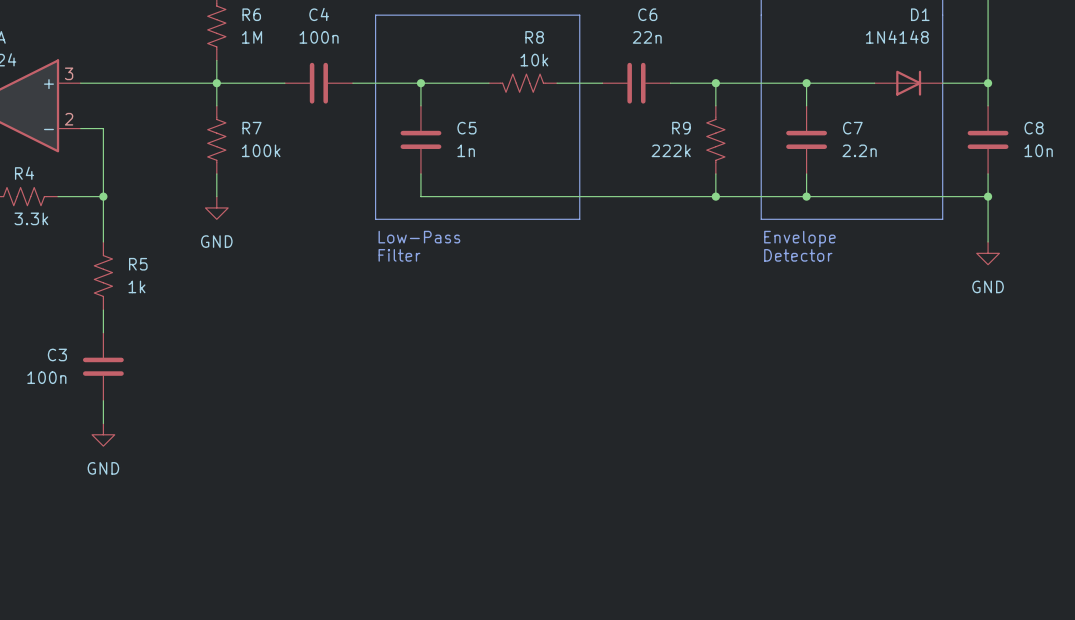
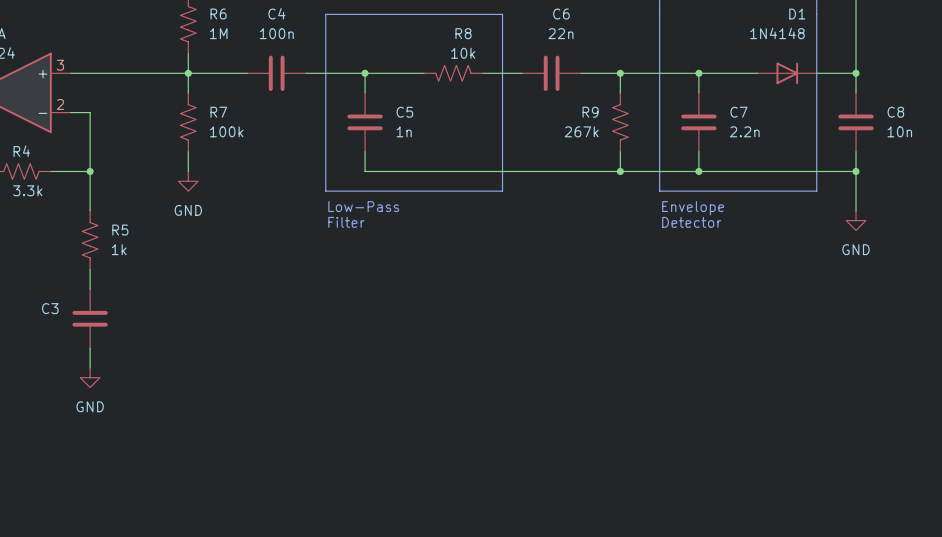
R9 value: 222k (671, 150) -> 267k (581, 131)
C3 value: 100n (46, 377) -> none

